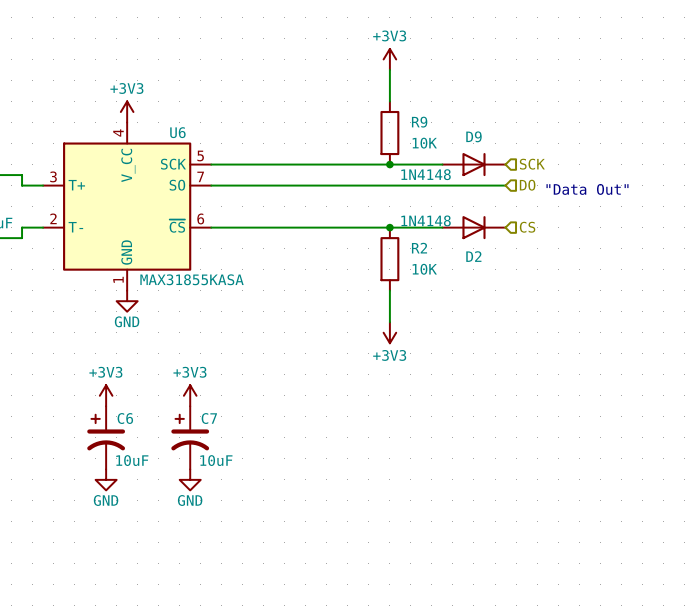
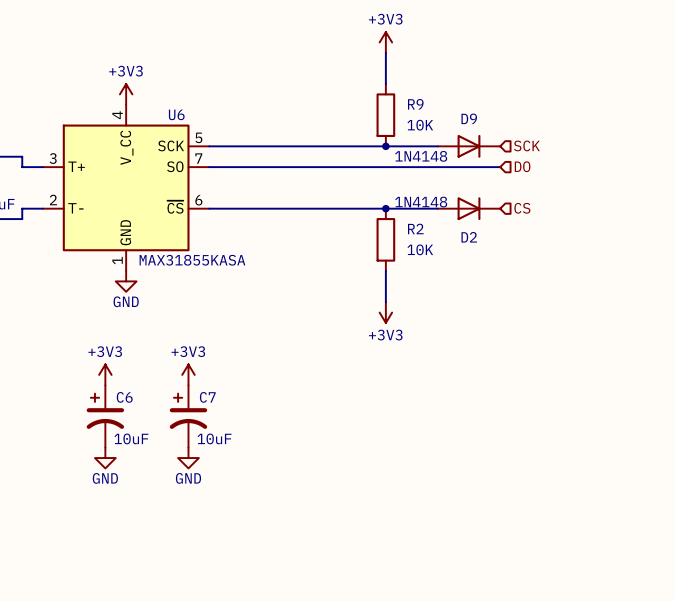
text: "Data Out" (587, 189) -> none

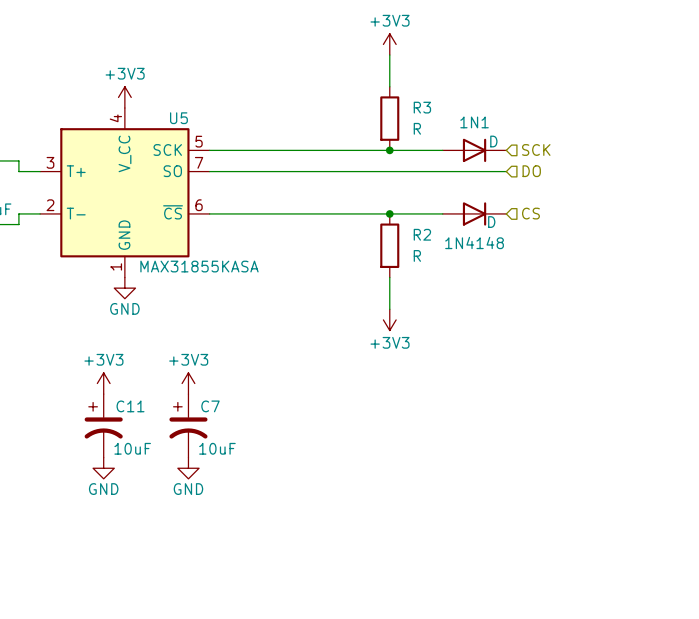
R9 name: R9 (415, 104) -> R3 (422, 107)
U6 name: U6 (176, 114) -> U5 (178, 118)
D9 name: D9 (469, 118) -> 1N1 (474, 122)
R9 value: 10K (420, 125) -> R (417, 128)
D9 value: 1N4148 (421, 156) -> D (493, 141)
D2 value: 1N4148 (421, 202) -> D (491, 222)
D2 name: D2 (469, 237) -> 1N4148 (474, 242)
R2 value: 10K (420, 249) -> R (417, 255)
C6 name: C6 (124, 397) -> C11 (130, 406)

